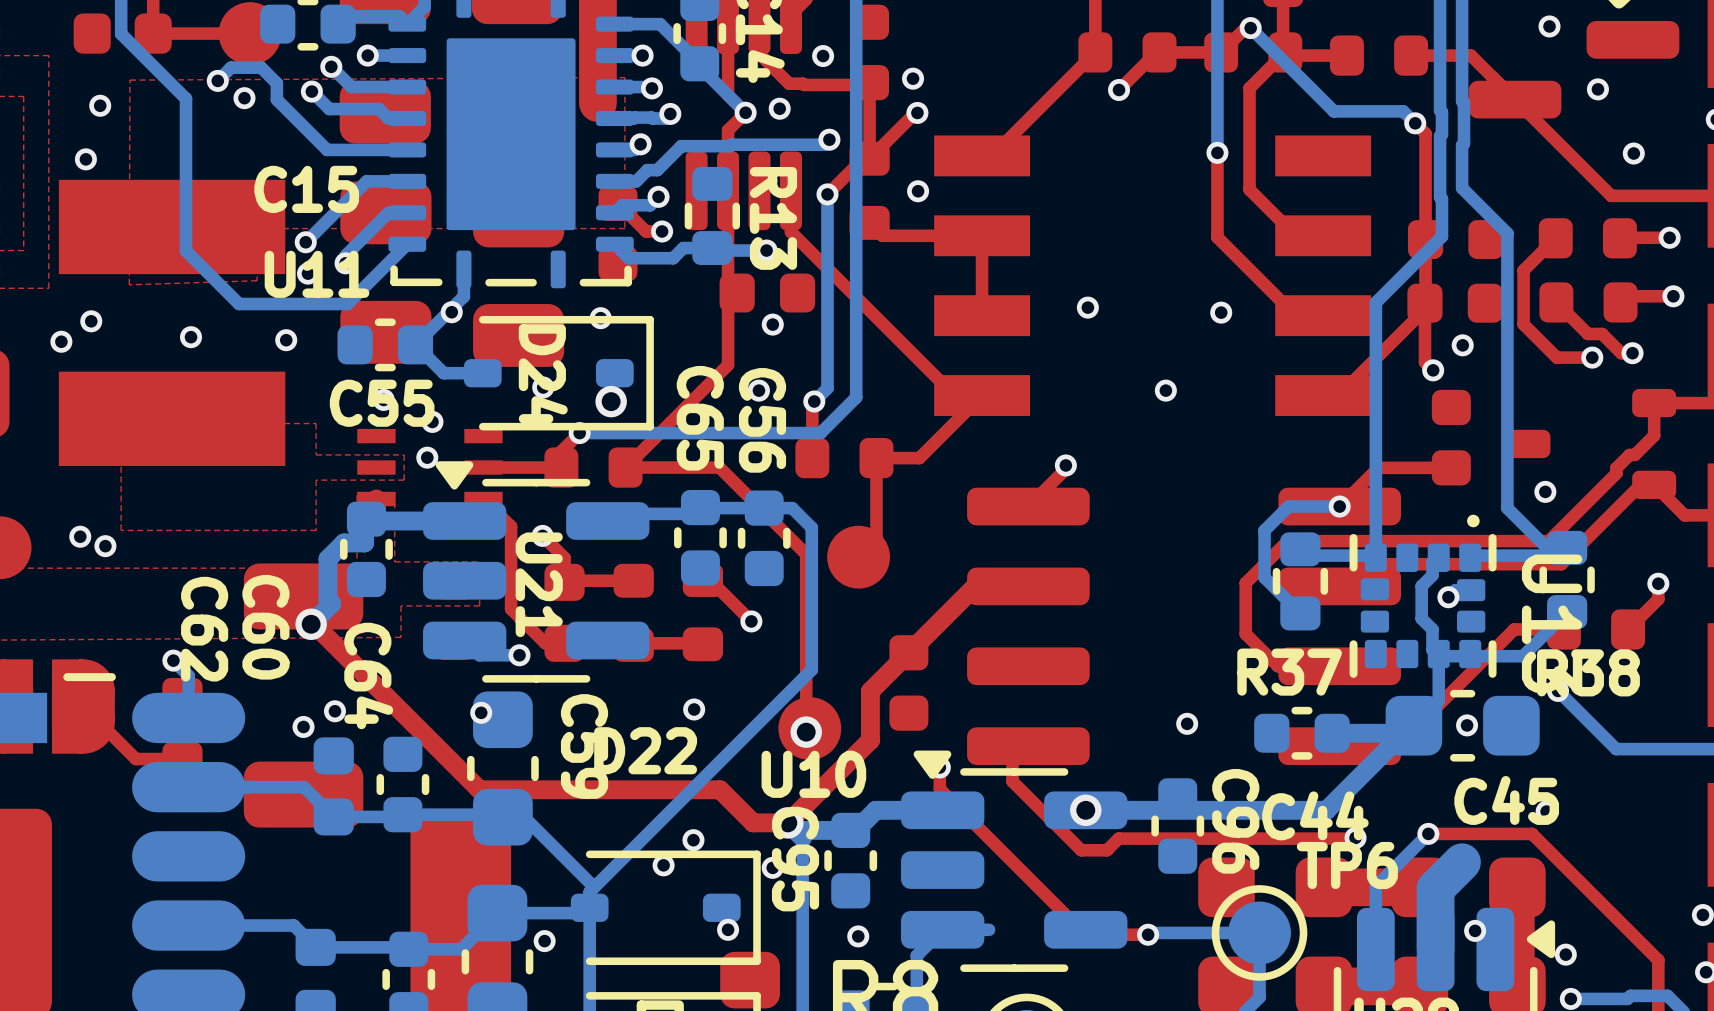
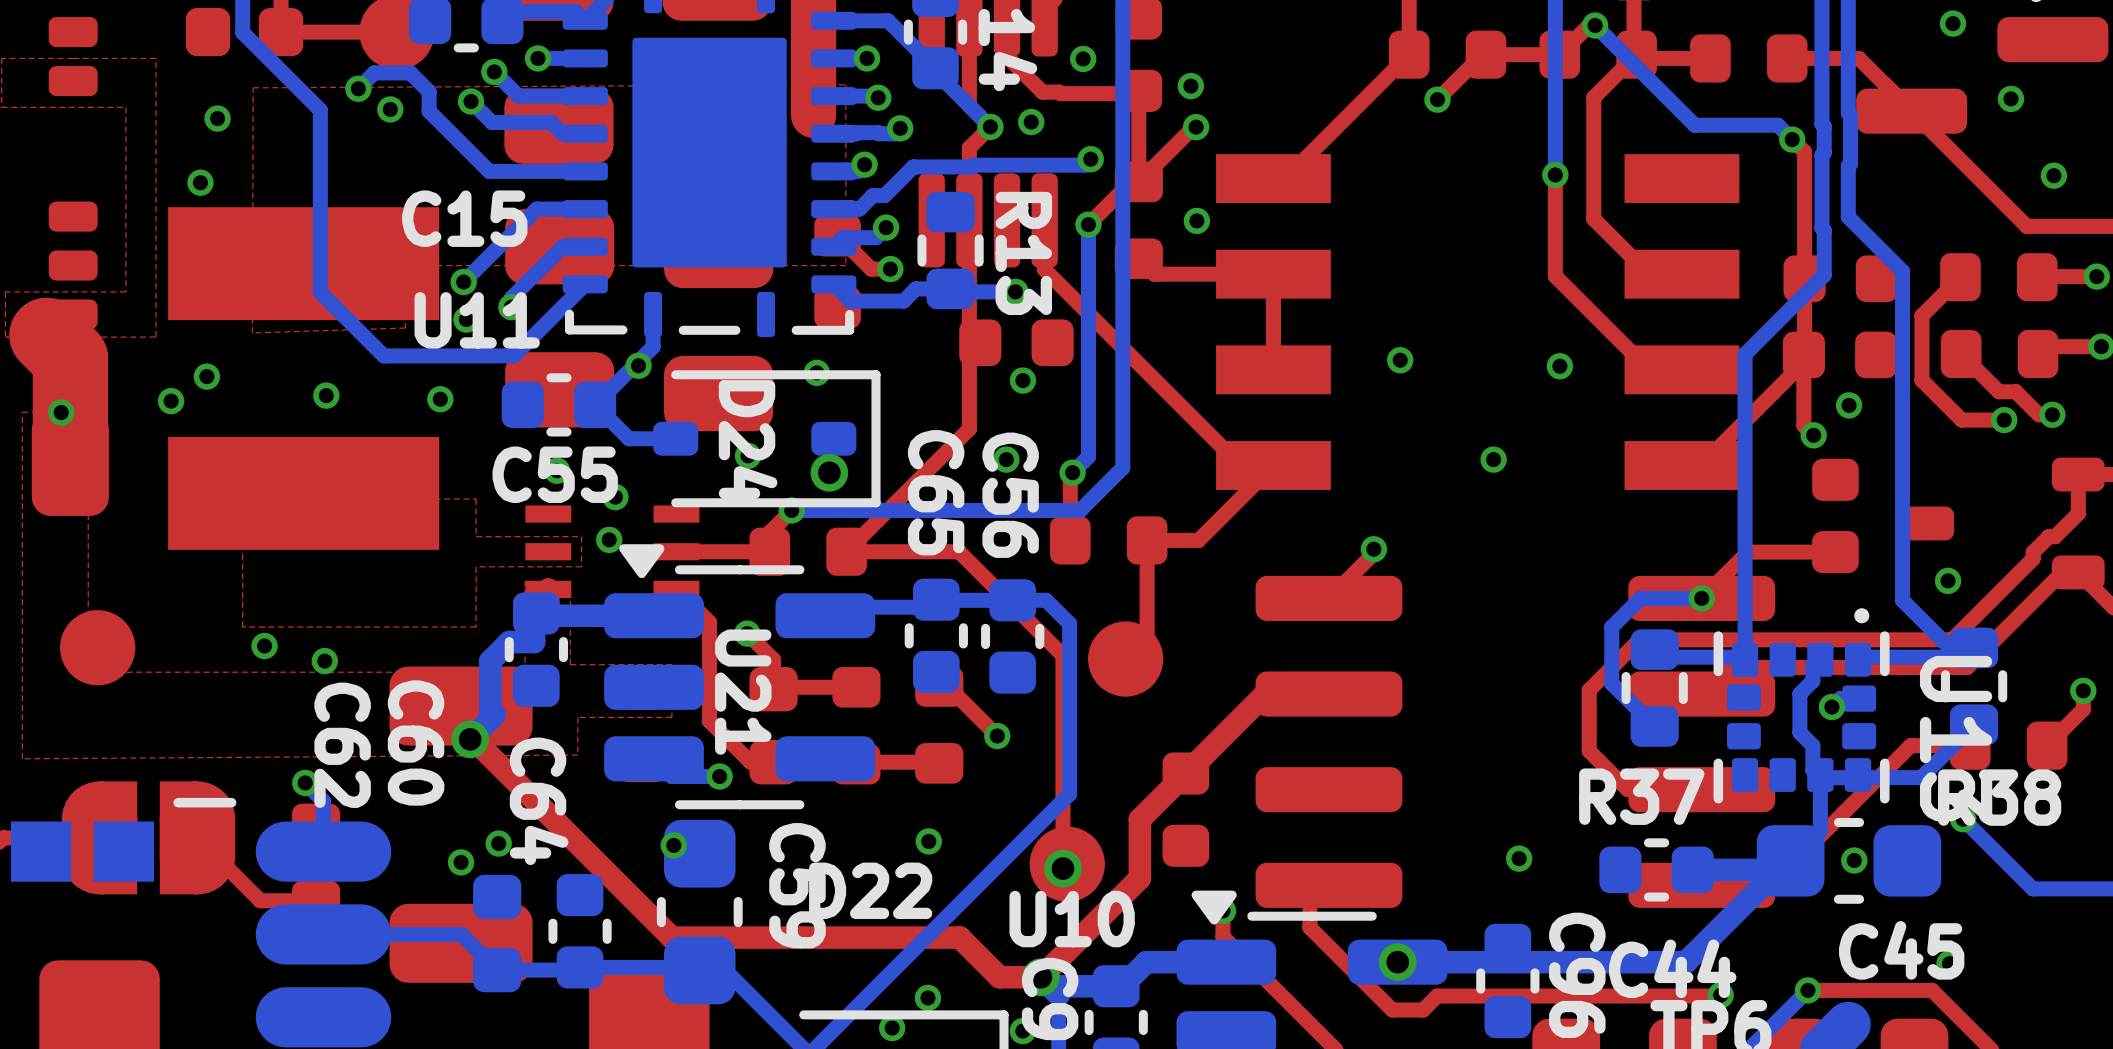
via: (80, 536) -> none
via: (105, 546) -> none
via: none -> (264, 646)
via: none -> (324, 661)

